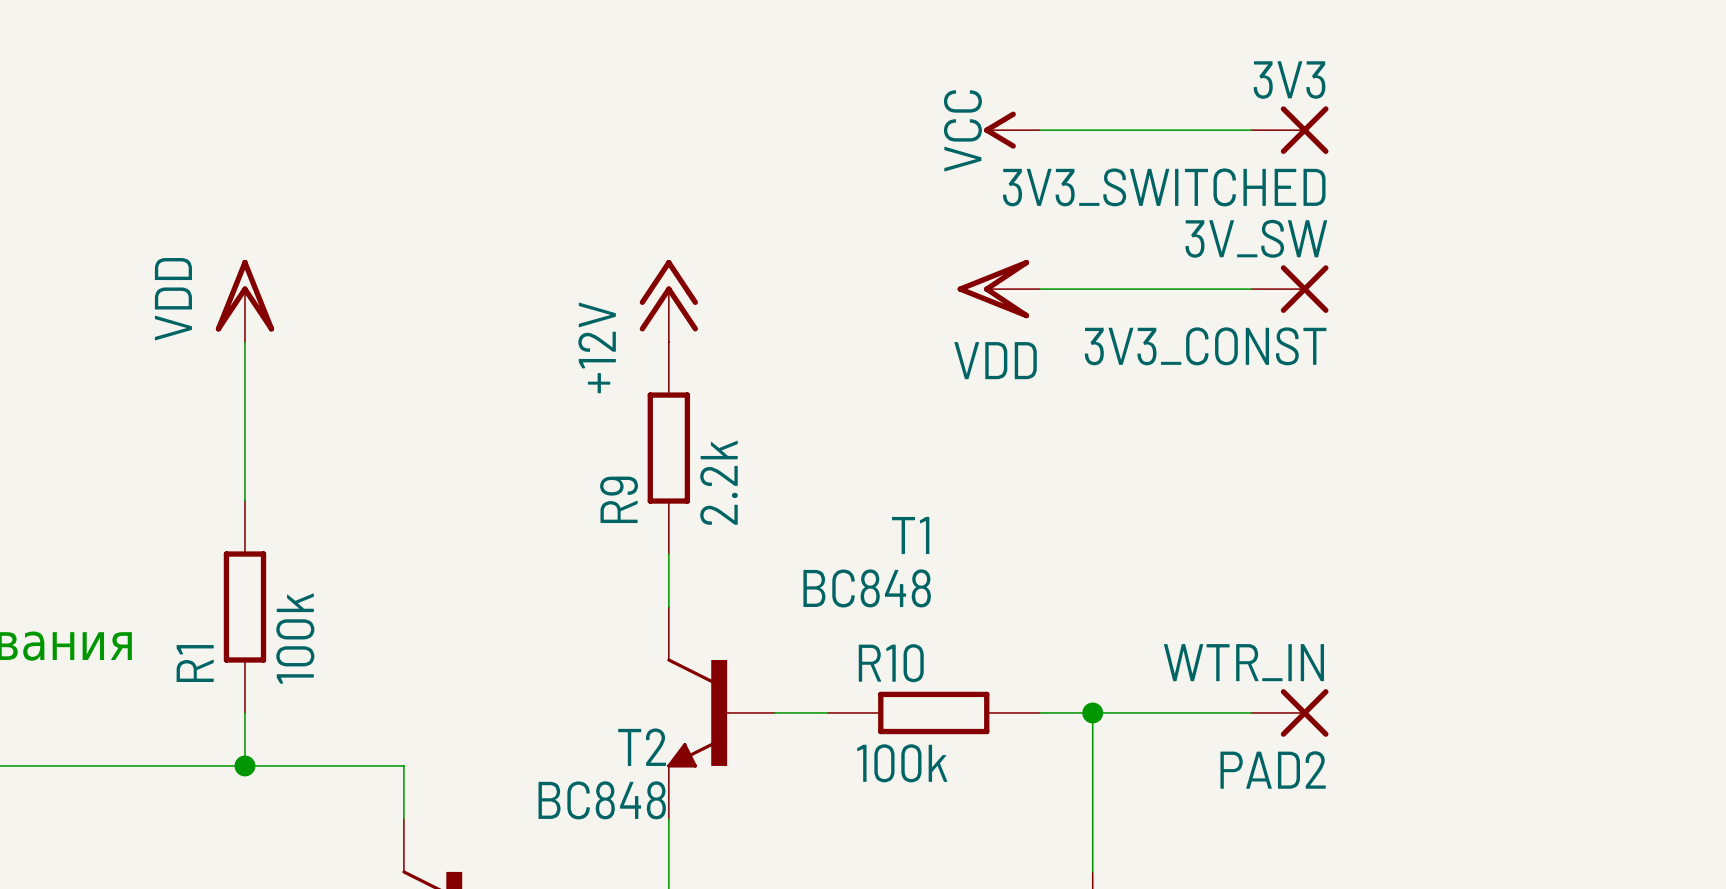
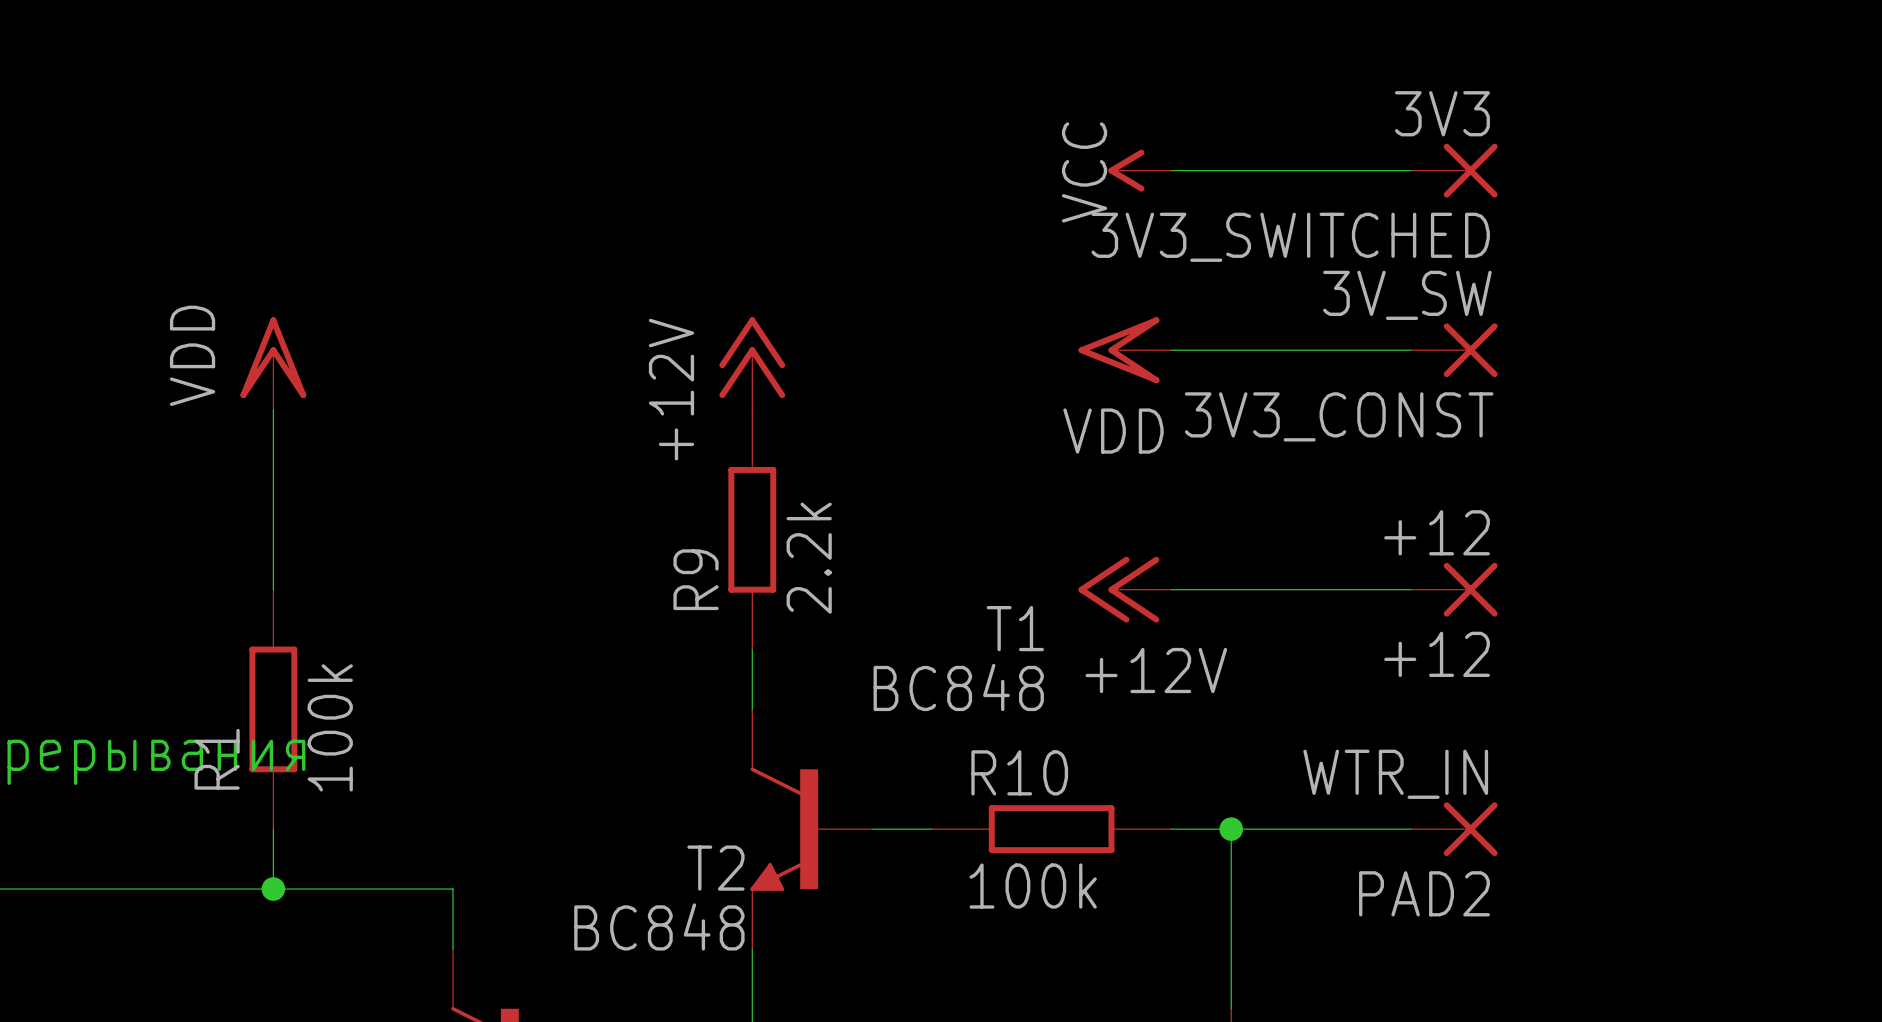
power symbol: none -> +12V (1124, 589)
wire: none -> (1171, 589) (1410, 589)
+12: none -> +12 (1454, 589)

